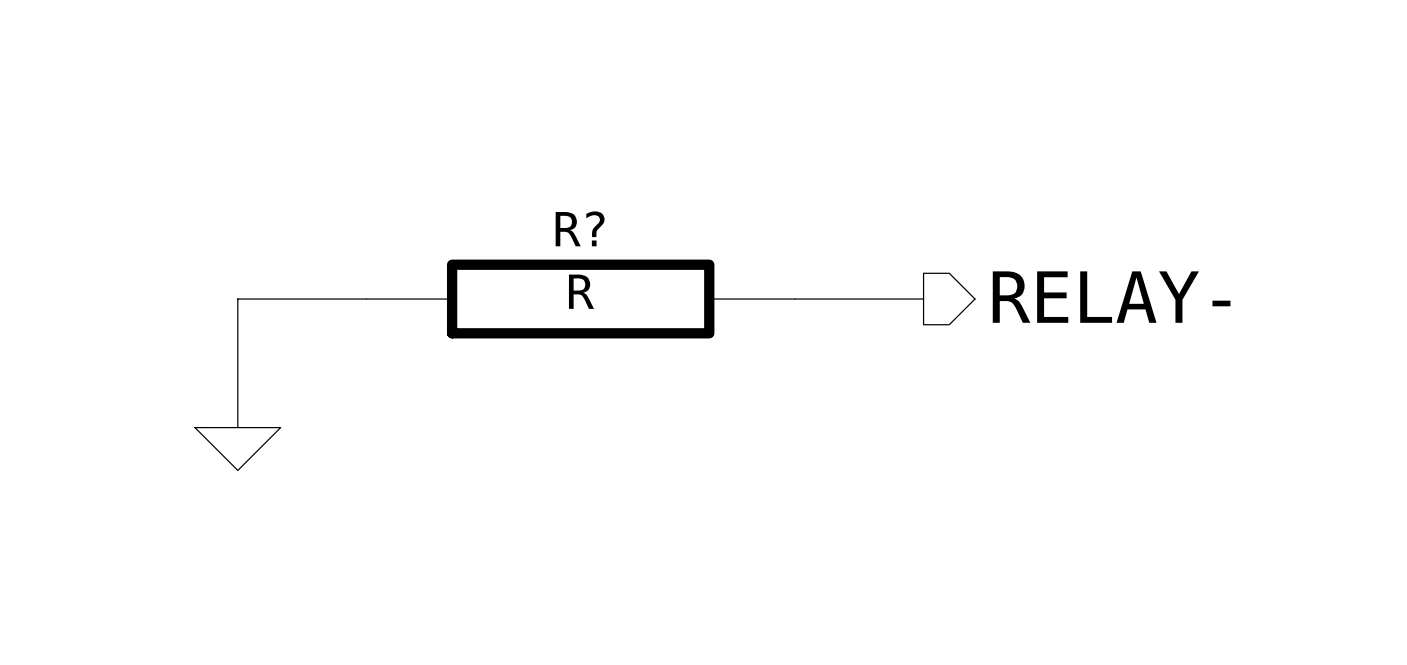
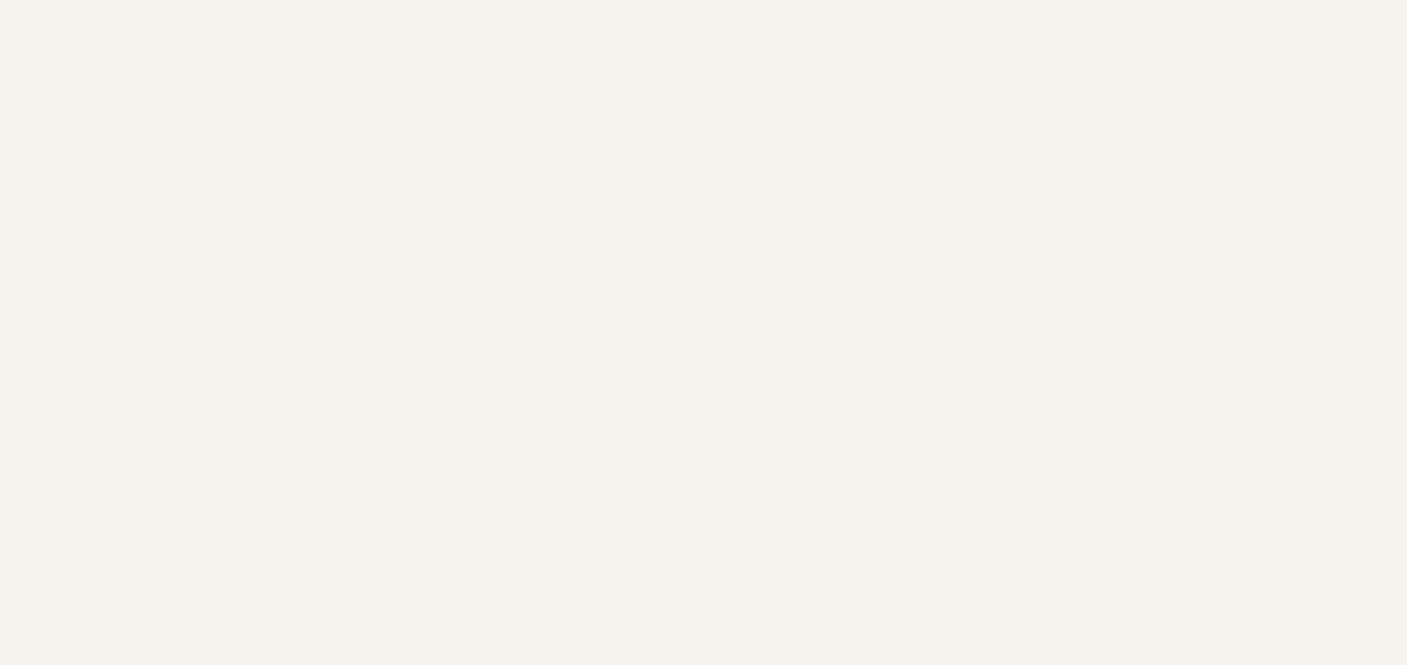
hierarchical label: RELAY- (1111, 297) -> none
wire: (366, 299) (237, 299) (237, 427) -> none
R?: R (580, 299) -> none
wire: (794, 299) (923, 299) -> none
power symbol: (237, 449) -> none

